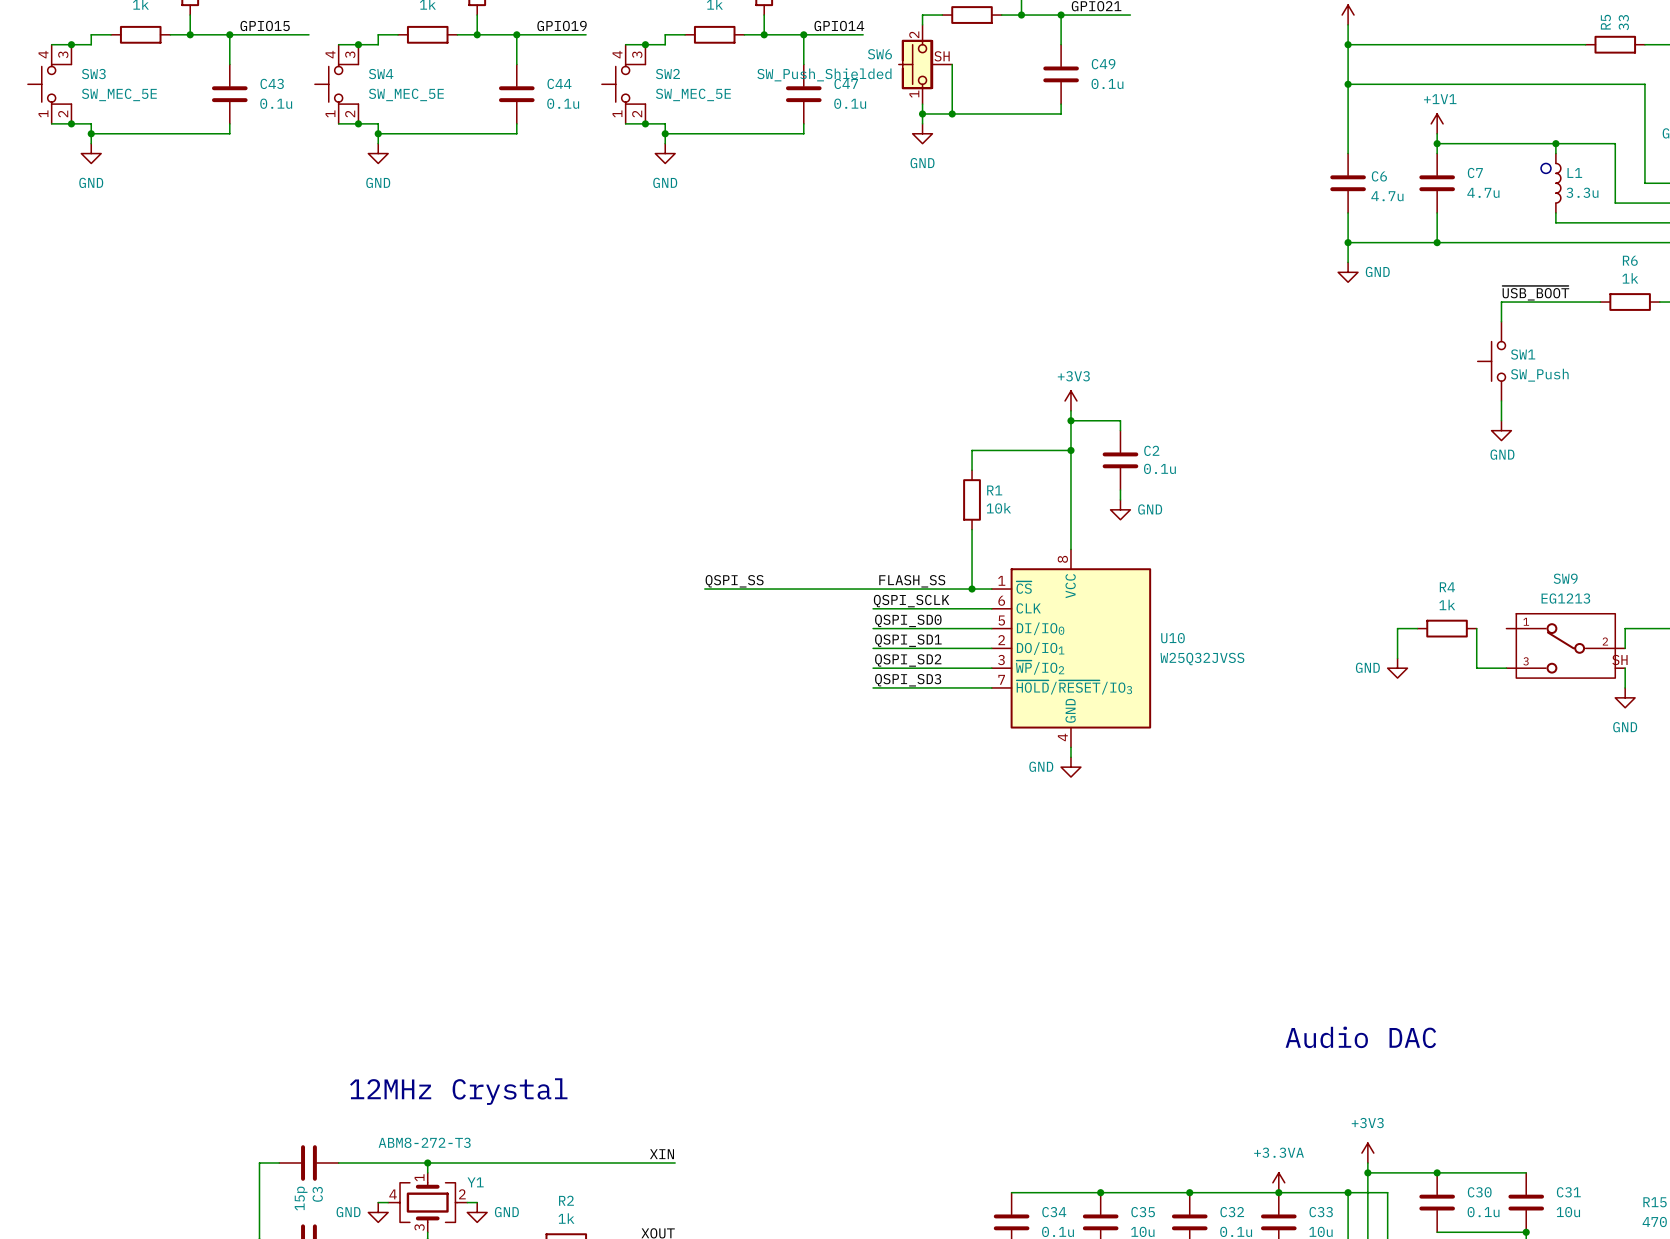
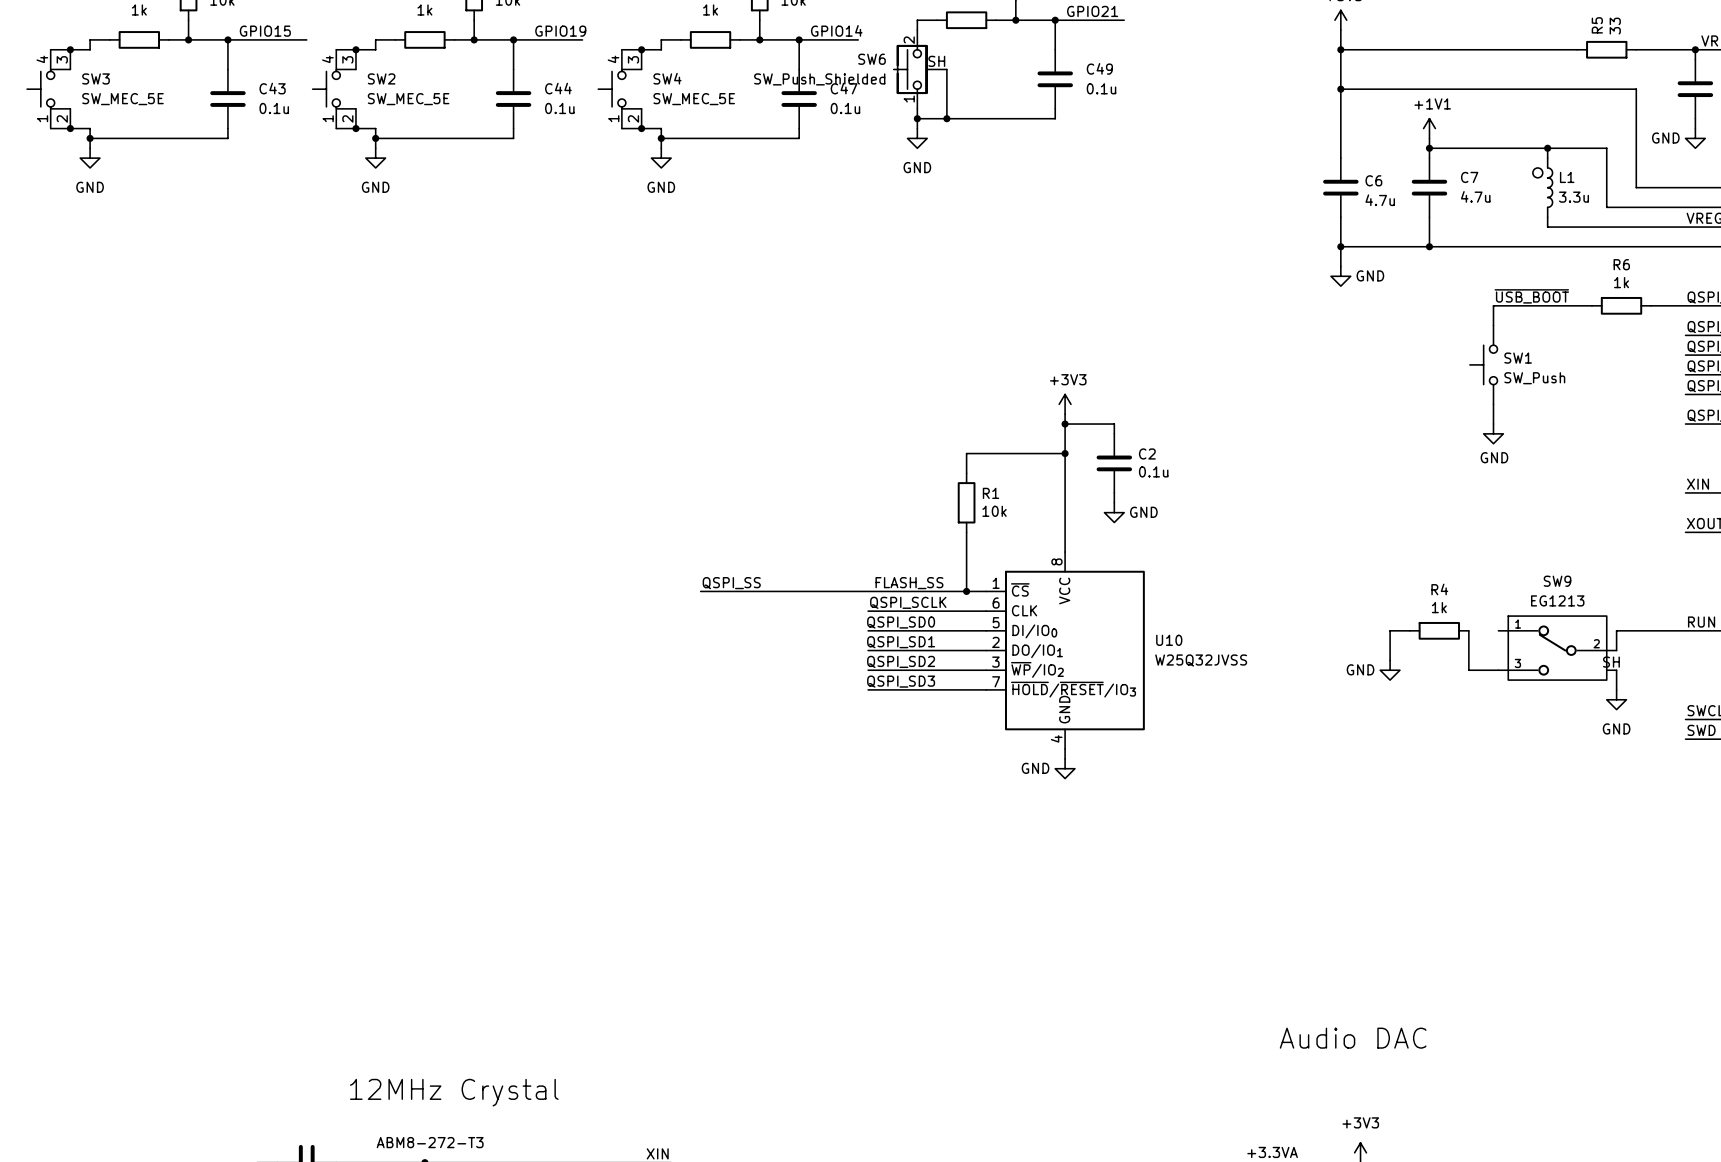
SW4 name: SW4 (381, 74) -> SW2 (381, 78)
SW2 name: SW2 (667, 74) -> SW4 (667, 78)

